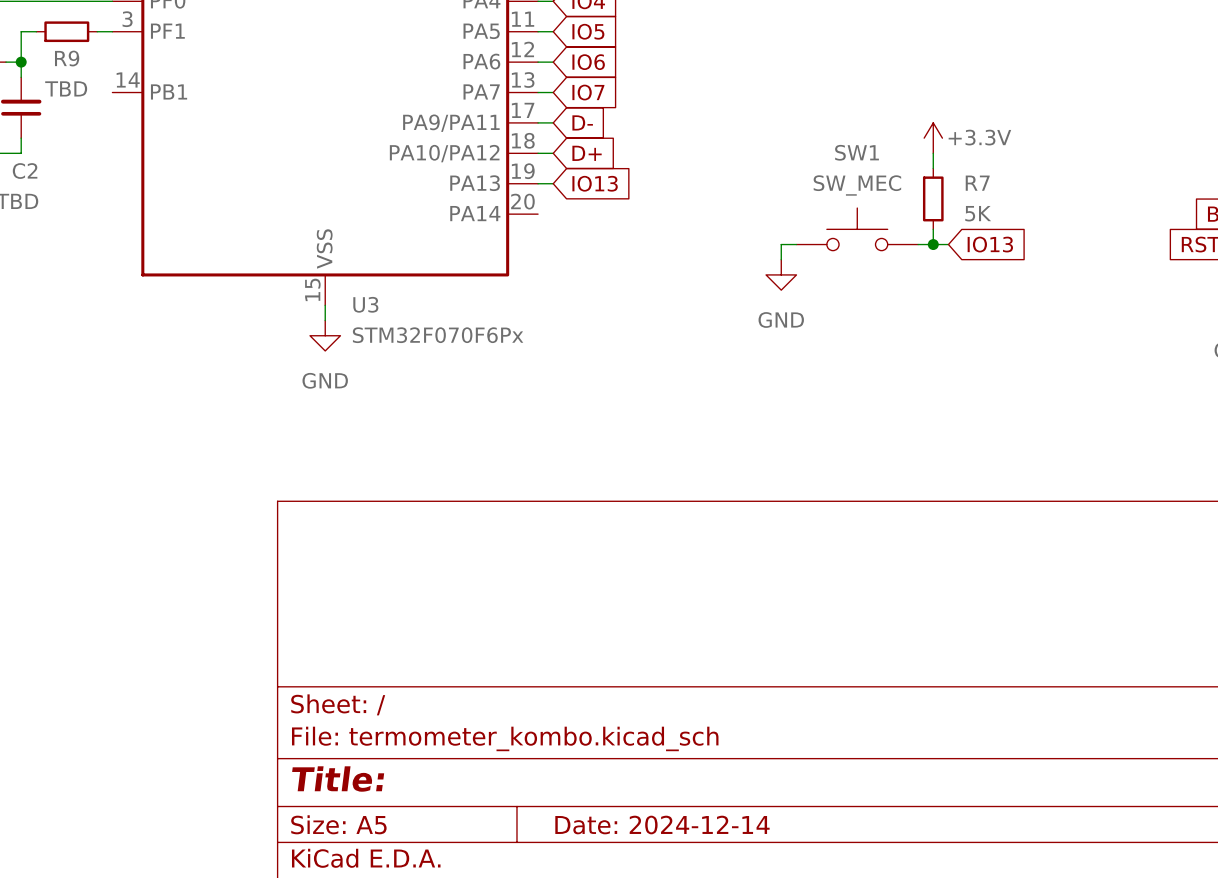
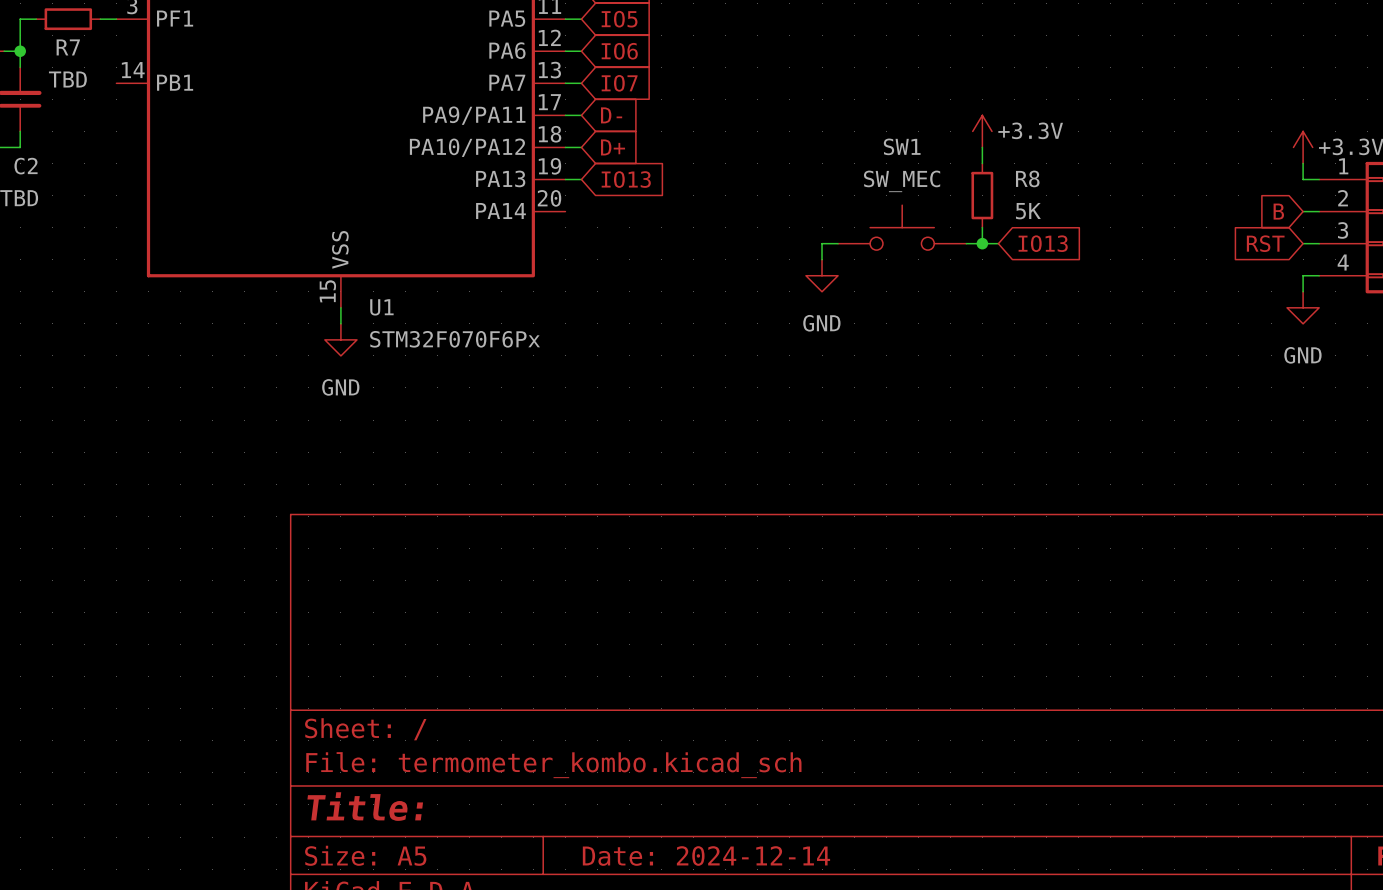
R9 name: R9 (67, 58) -> R7 (68, 47)
R7 name: R7 (977, 183) -> R8 (1027, 178)
U3 name: U3 (365, 304) -> U1 (381, 307)

